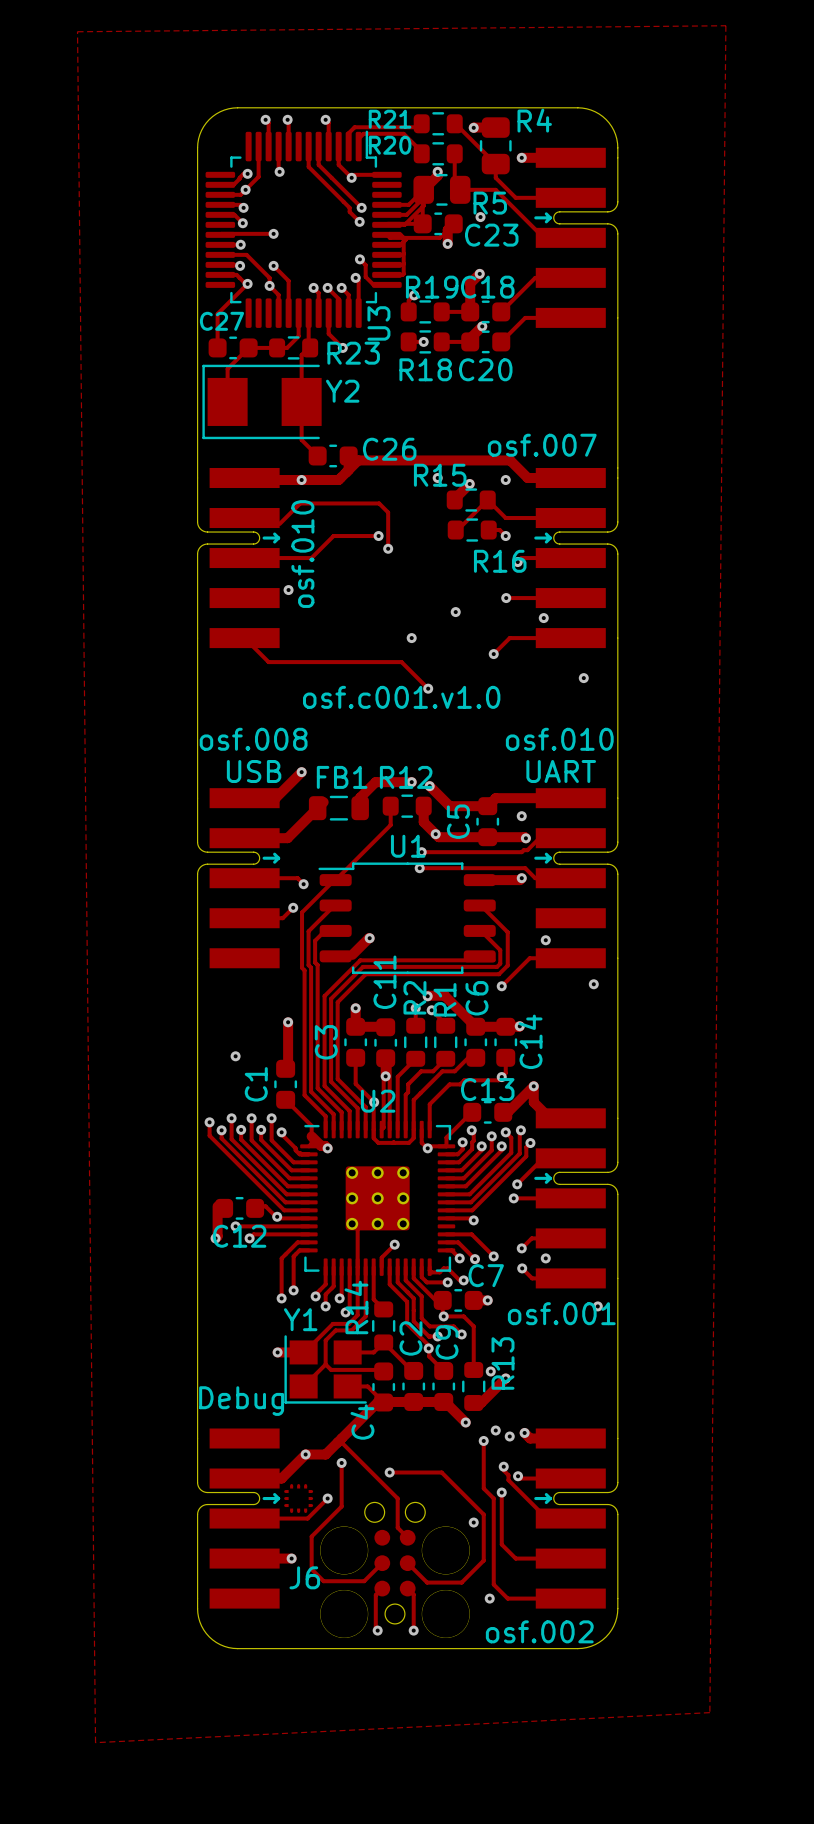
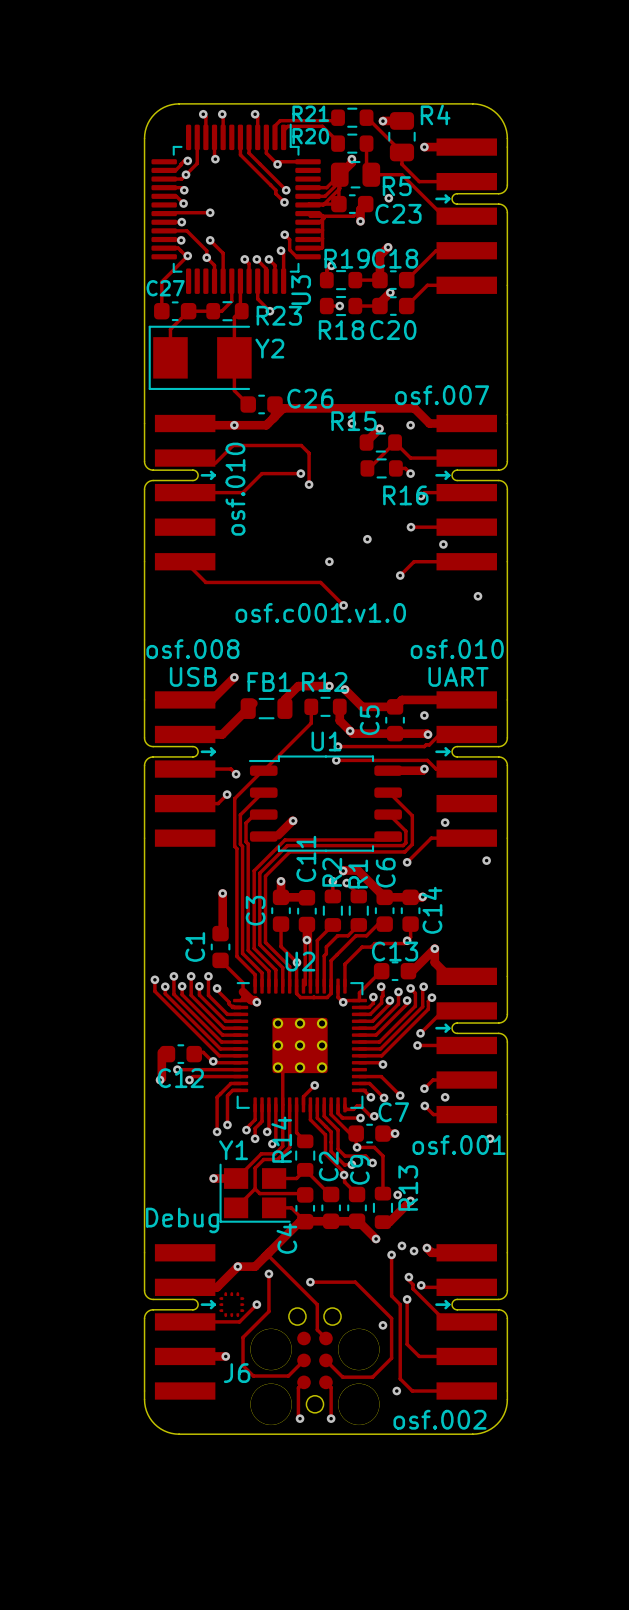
zone outline: (725, 25) (77, 31) (95, 1742) (709, 1712) (725, 25) -> none
via: (288, 590) -> none
via: (235, 1056) -> none

